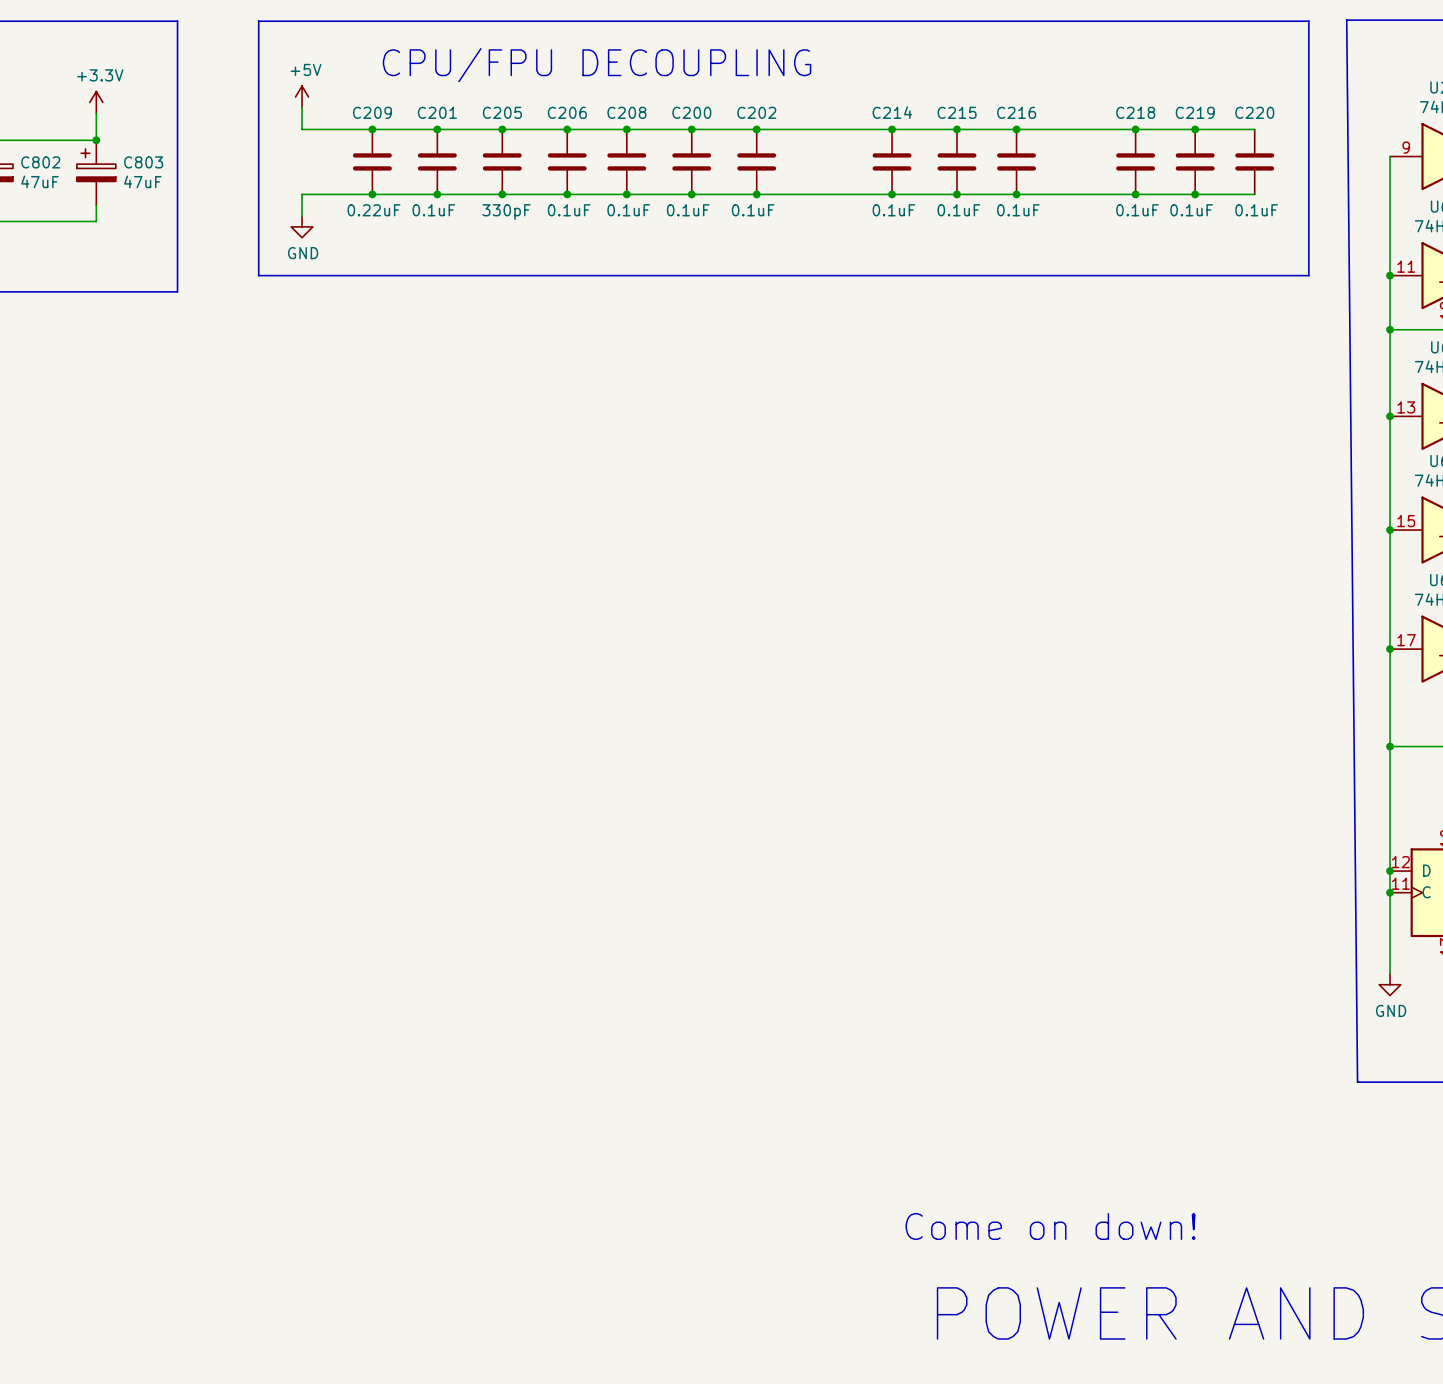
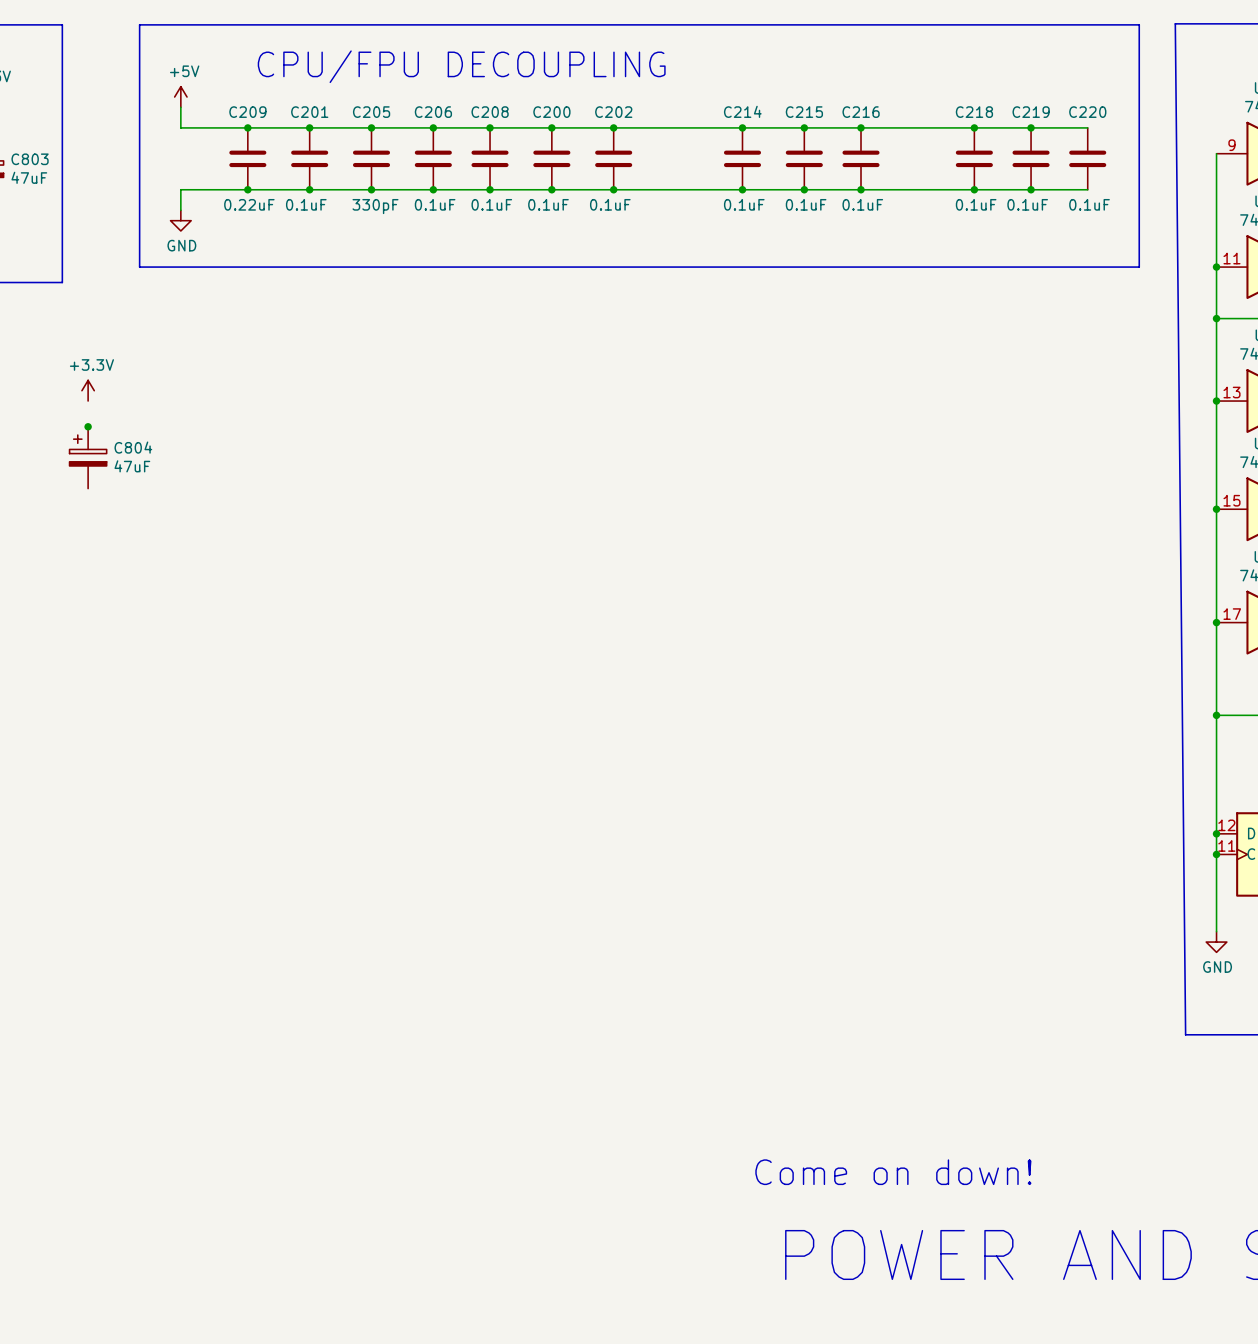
power symbol: none -> +3.3V (88, 390)
junction: none -> (88, 426)
C804: none -> 47uF (88, 457)

